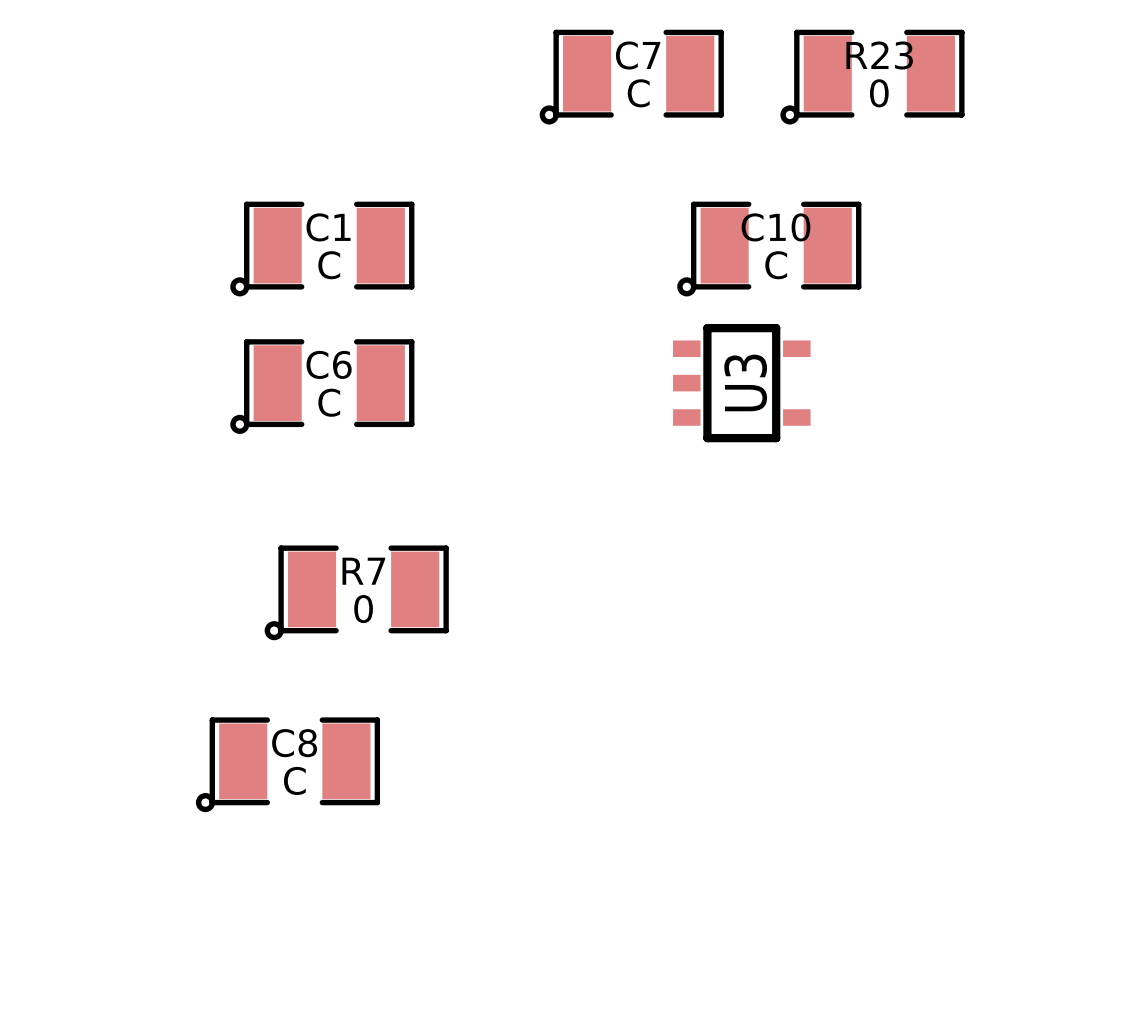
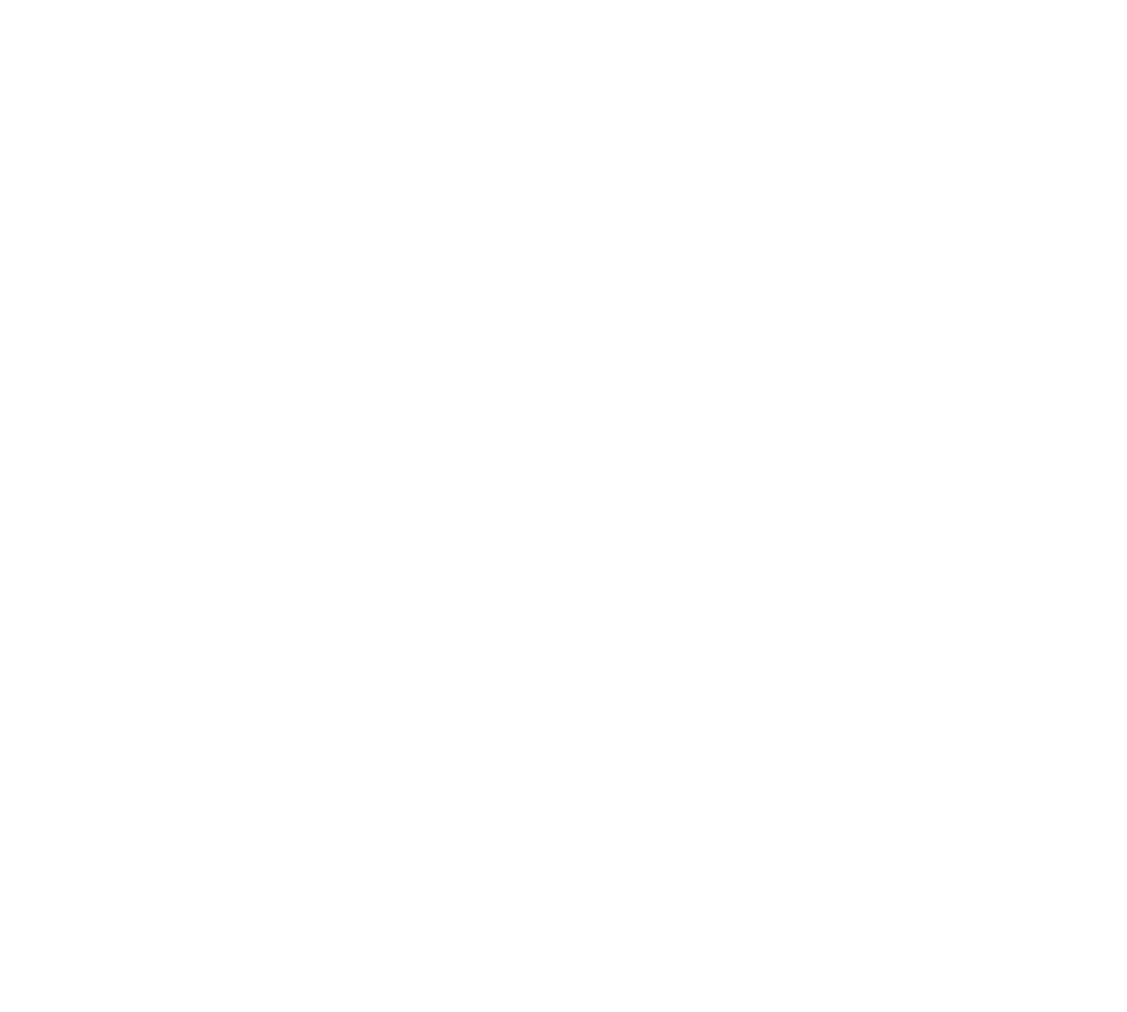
C7: C (631, 77) -> none
R23: 0 (872, 77) -> none
C1: C (322, 249) -> none
C10: C (769, 249) -> none
U3: (741, 383) -> none
C6: C (322, 386) -> none
R7: 0 (356, 592) -> none
C8: C (287, 764) -> none

